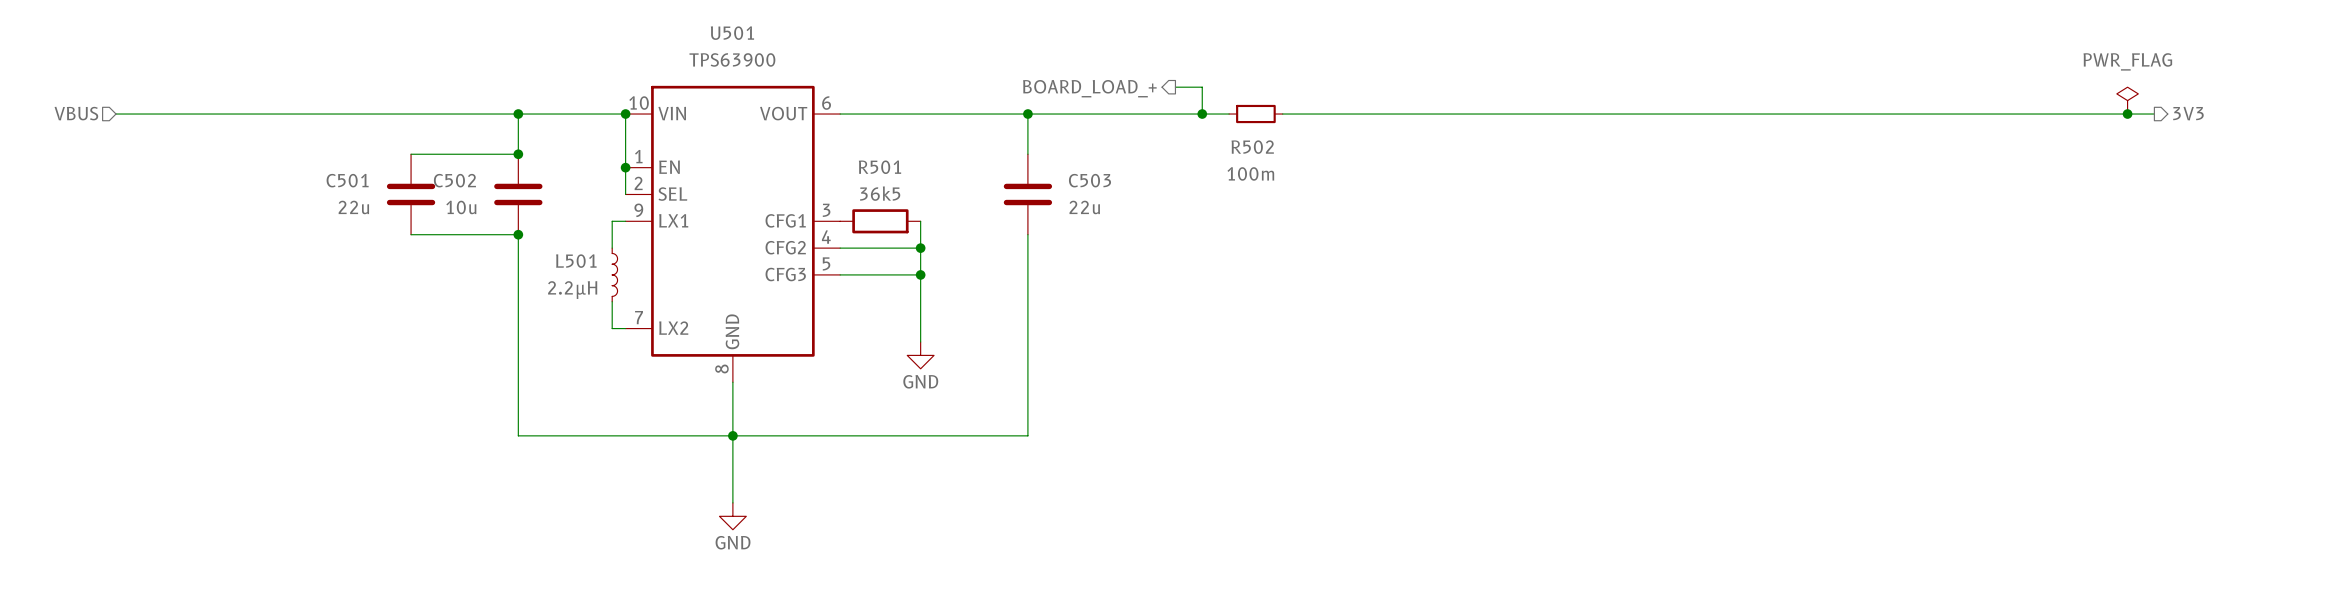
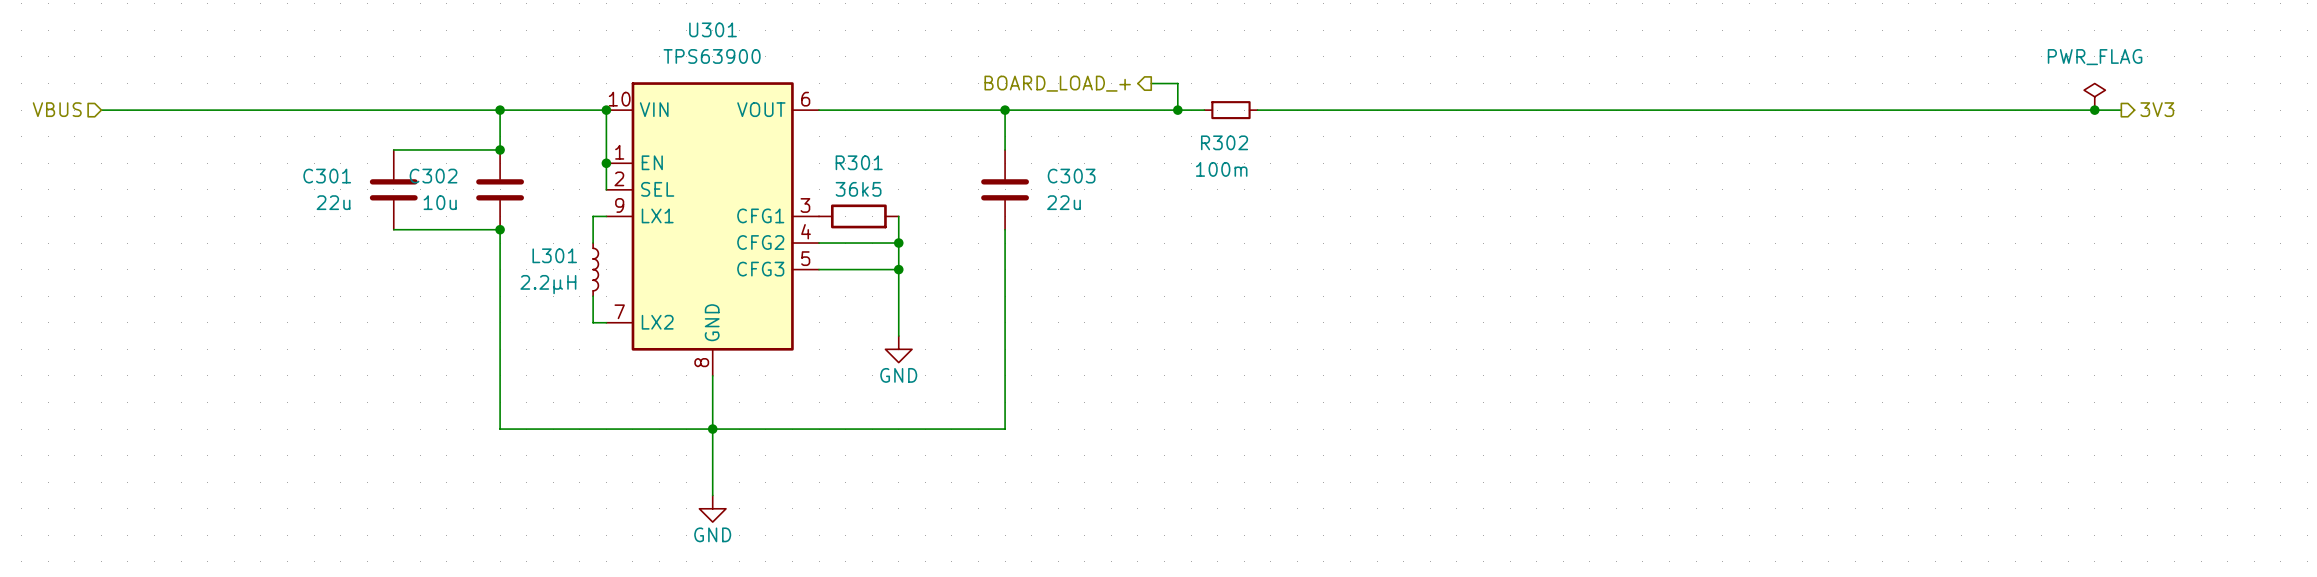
U501 name: U501 (732, 33) -> U301 (713, 29)
R502 name: R502 (1252, 147) -> R302 (1224, 142)
R501 name: R501 (879, 167) -> R301 (859, 162)
C501 name: C501 (347, 180) -> C301 (327, 176)
C502 name: C502 (454, 180) -> C302 (433, 176)
C503 name: C503 (1089, 180) -> C303 (1071, 176)
L501 name: L501 (576, 261) -> L301 (554, 255)

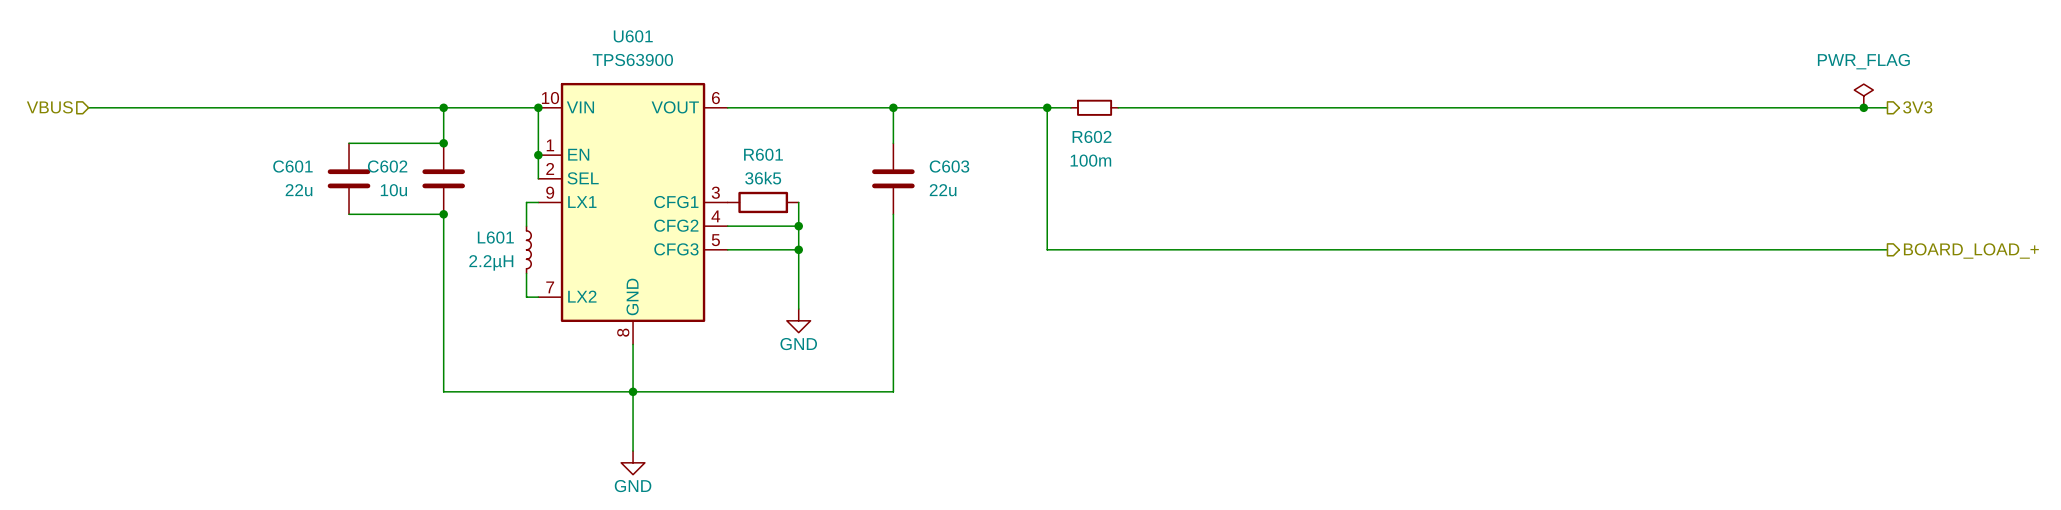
U301 name: U301 (713, 29) -> U601 (633, 36)
hierarchical label: BOARD_LOAD_+ (1057, 83) -> none
wire: (1151, 83) (1177, 83) (1177, 110) -> (1887, 249) (1047, 249) (1047, 107)
R302 name: R302 (1224, 142) -> R602 (1092, 136)
R301 name: R301 (859, 162) -> R601 (763, 154)
C301 name: C301 (327, 176) -> C601 (292, 166)
C302 name: C302 (433, 176) -> C602 (387, 166)
C303 name: C303 (1071, 176) -> C603 (949, 166)
L301 name: L301 (554, 255) -> L601 (495, 237)
hierarchical label: none -> BOARD_LOAD_+ (1971, 250)

